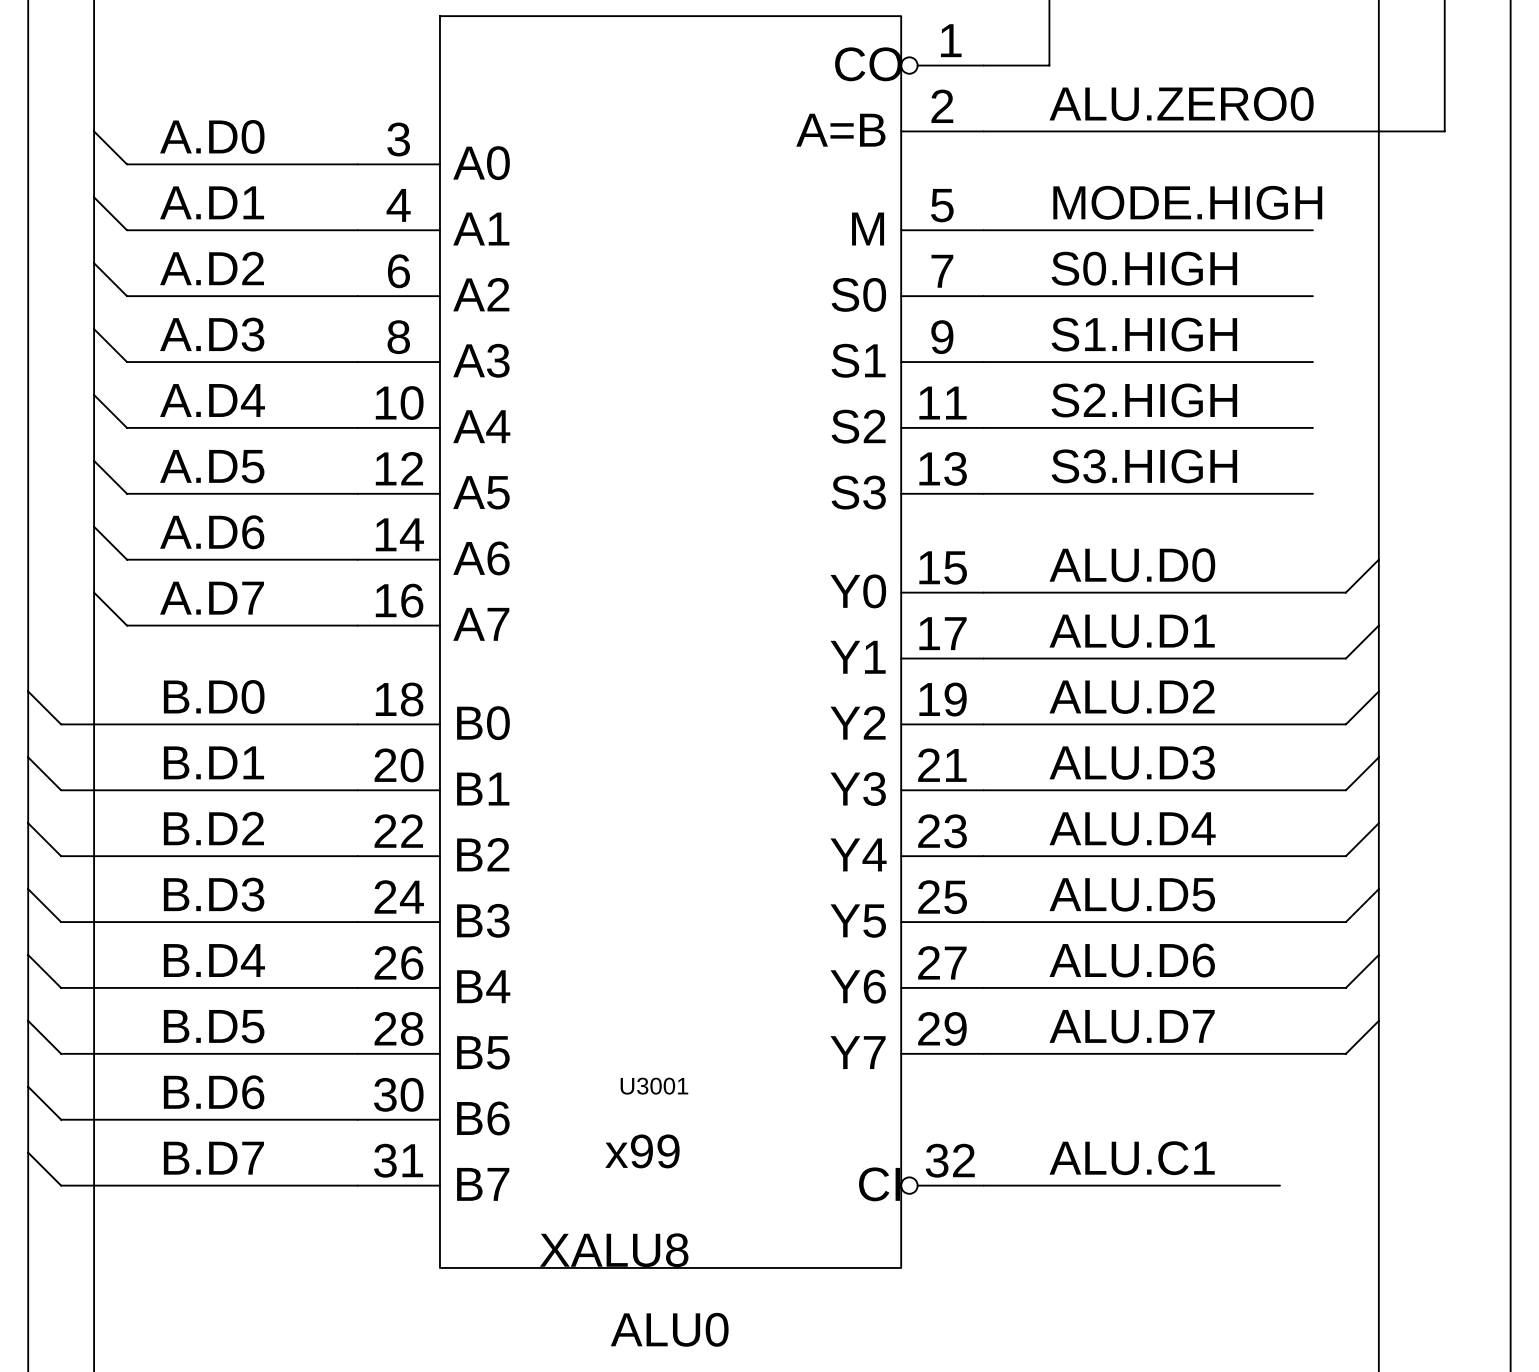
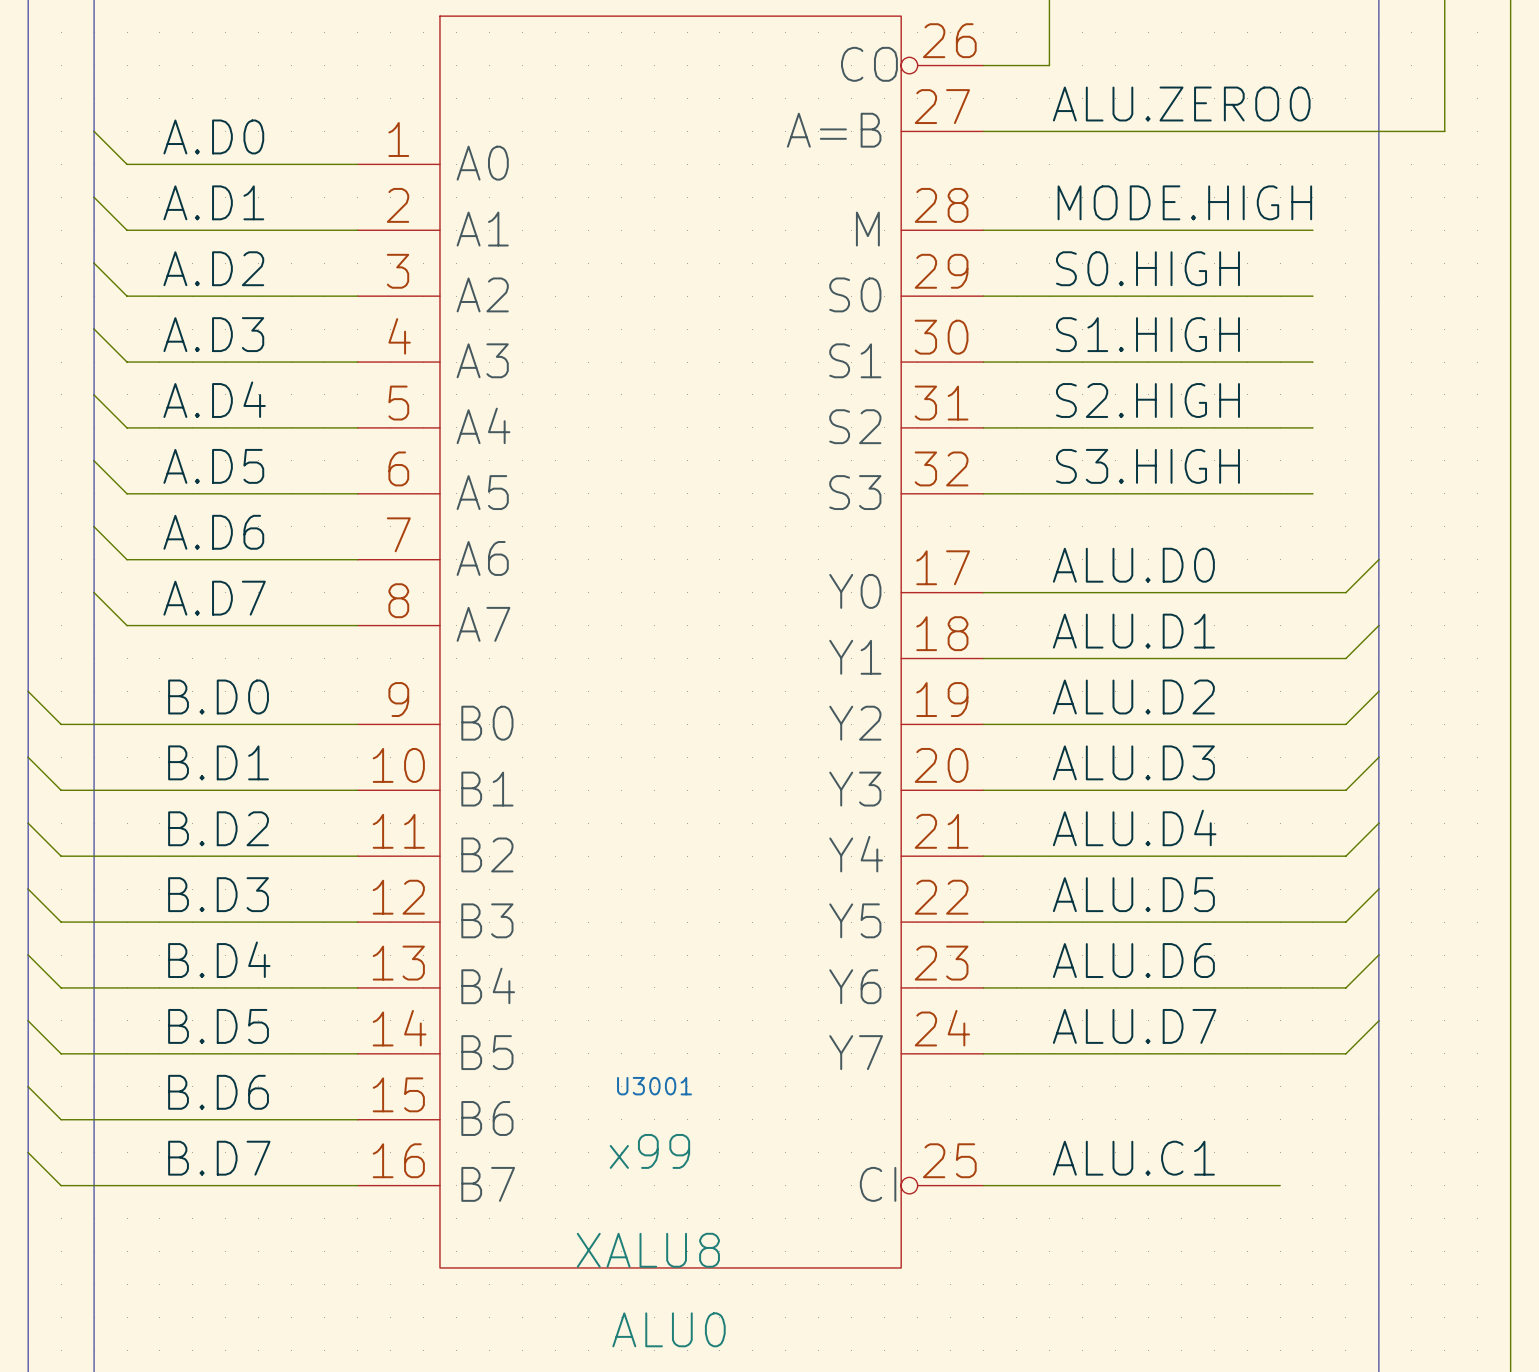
U3001 symbol: [357, 16, 984, 1268] -> [357, 16, 984, 1268]
U3001 value position: XALU8 (614, 1250) -> XALU8 (648, 1250)

